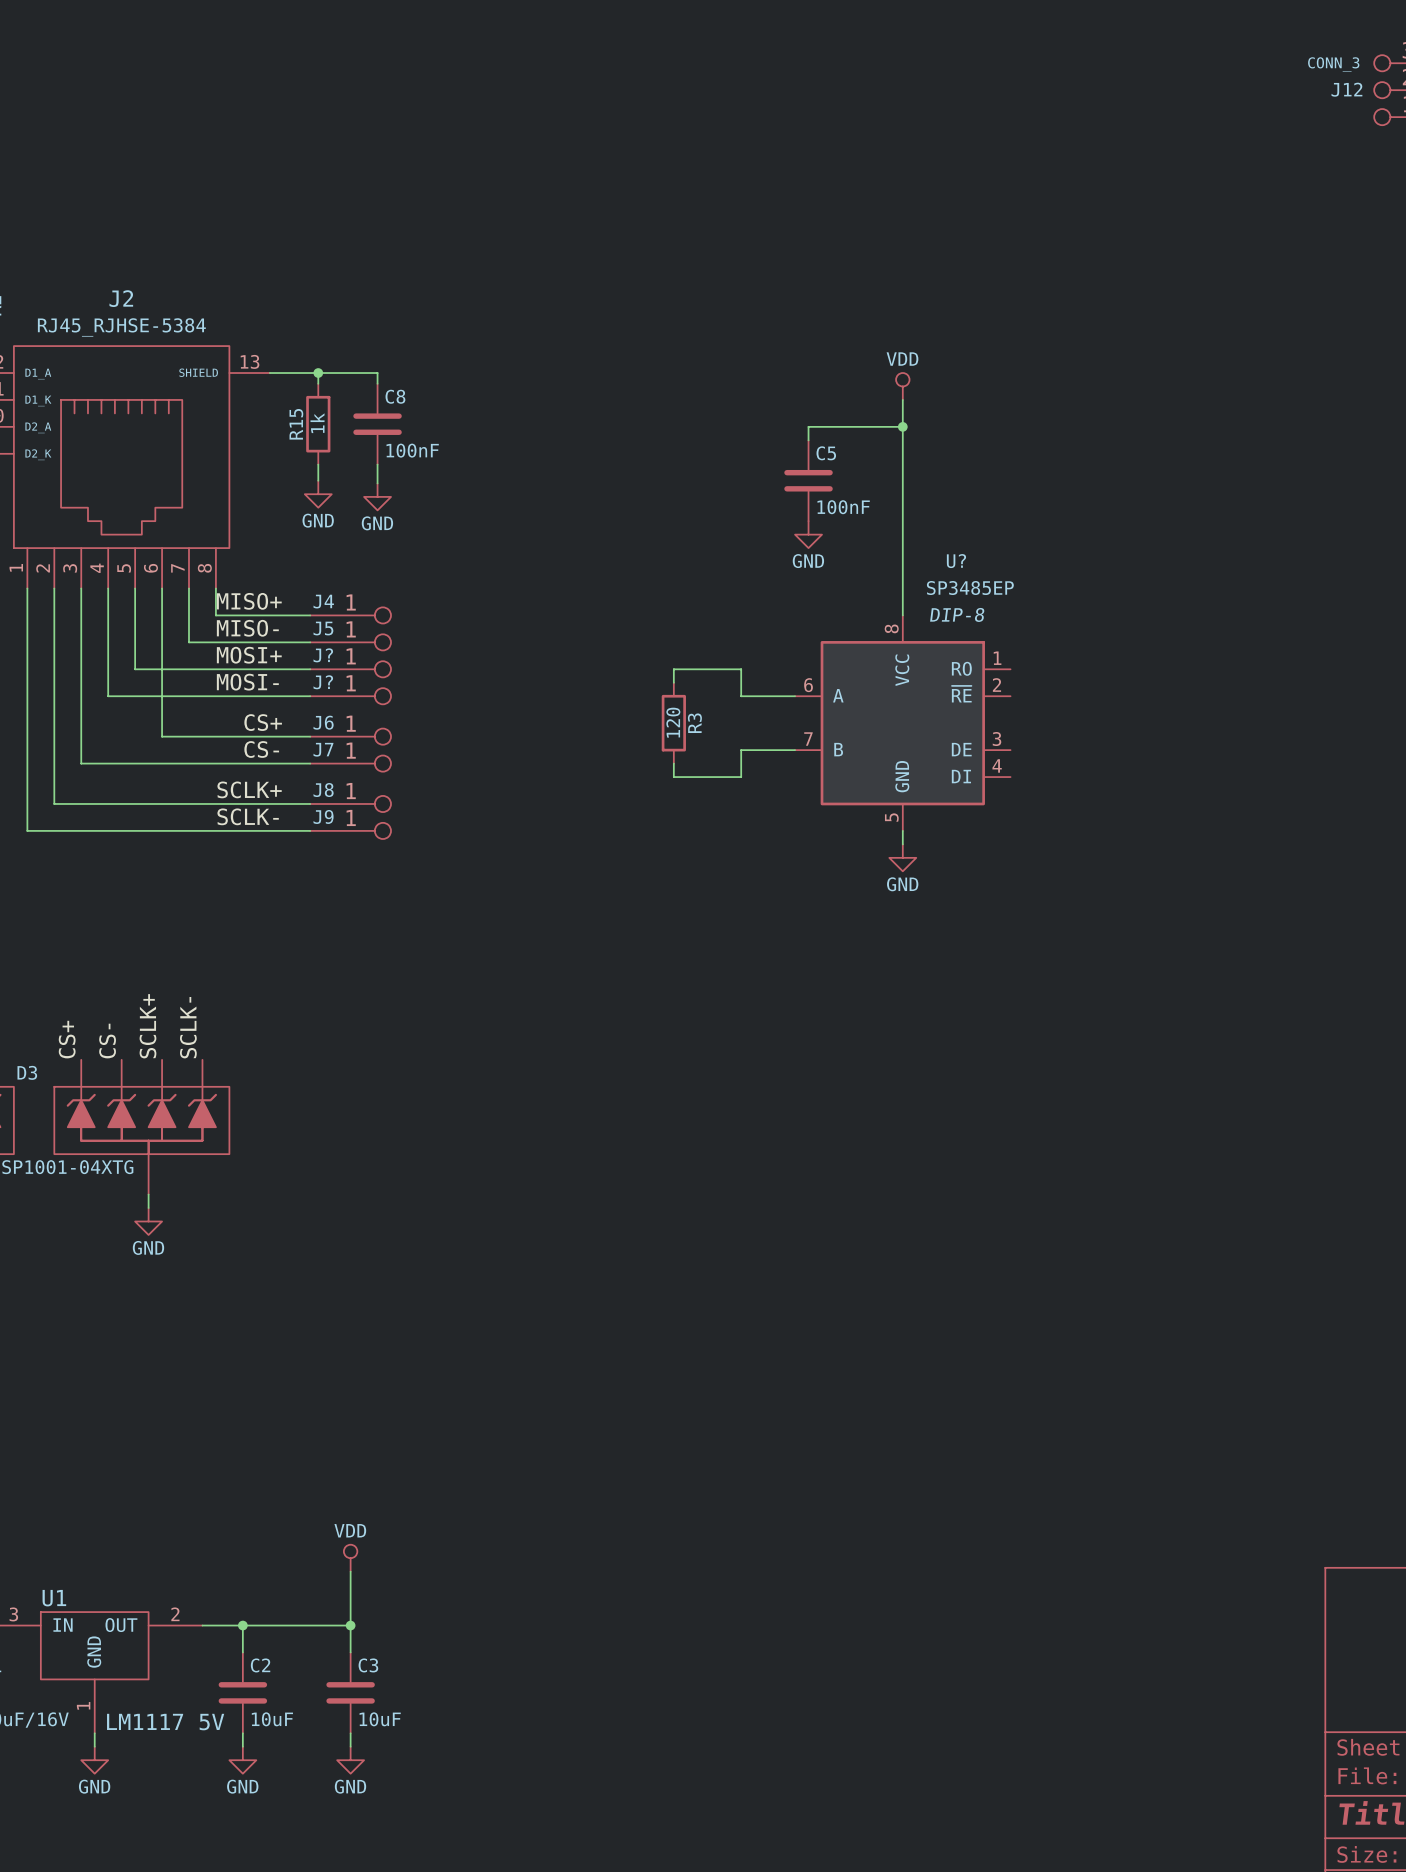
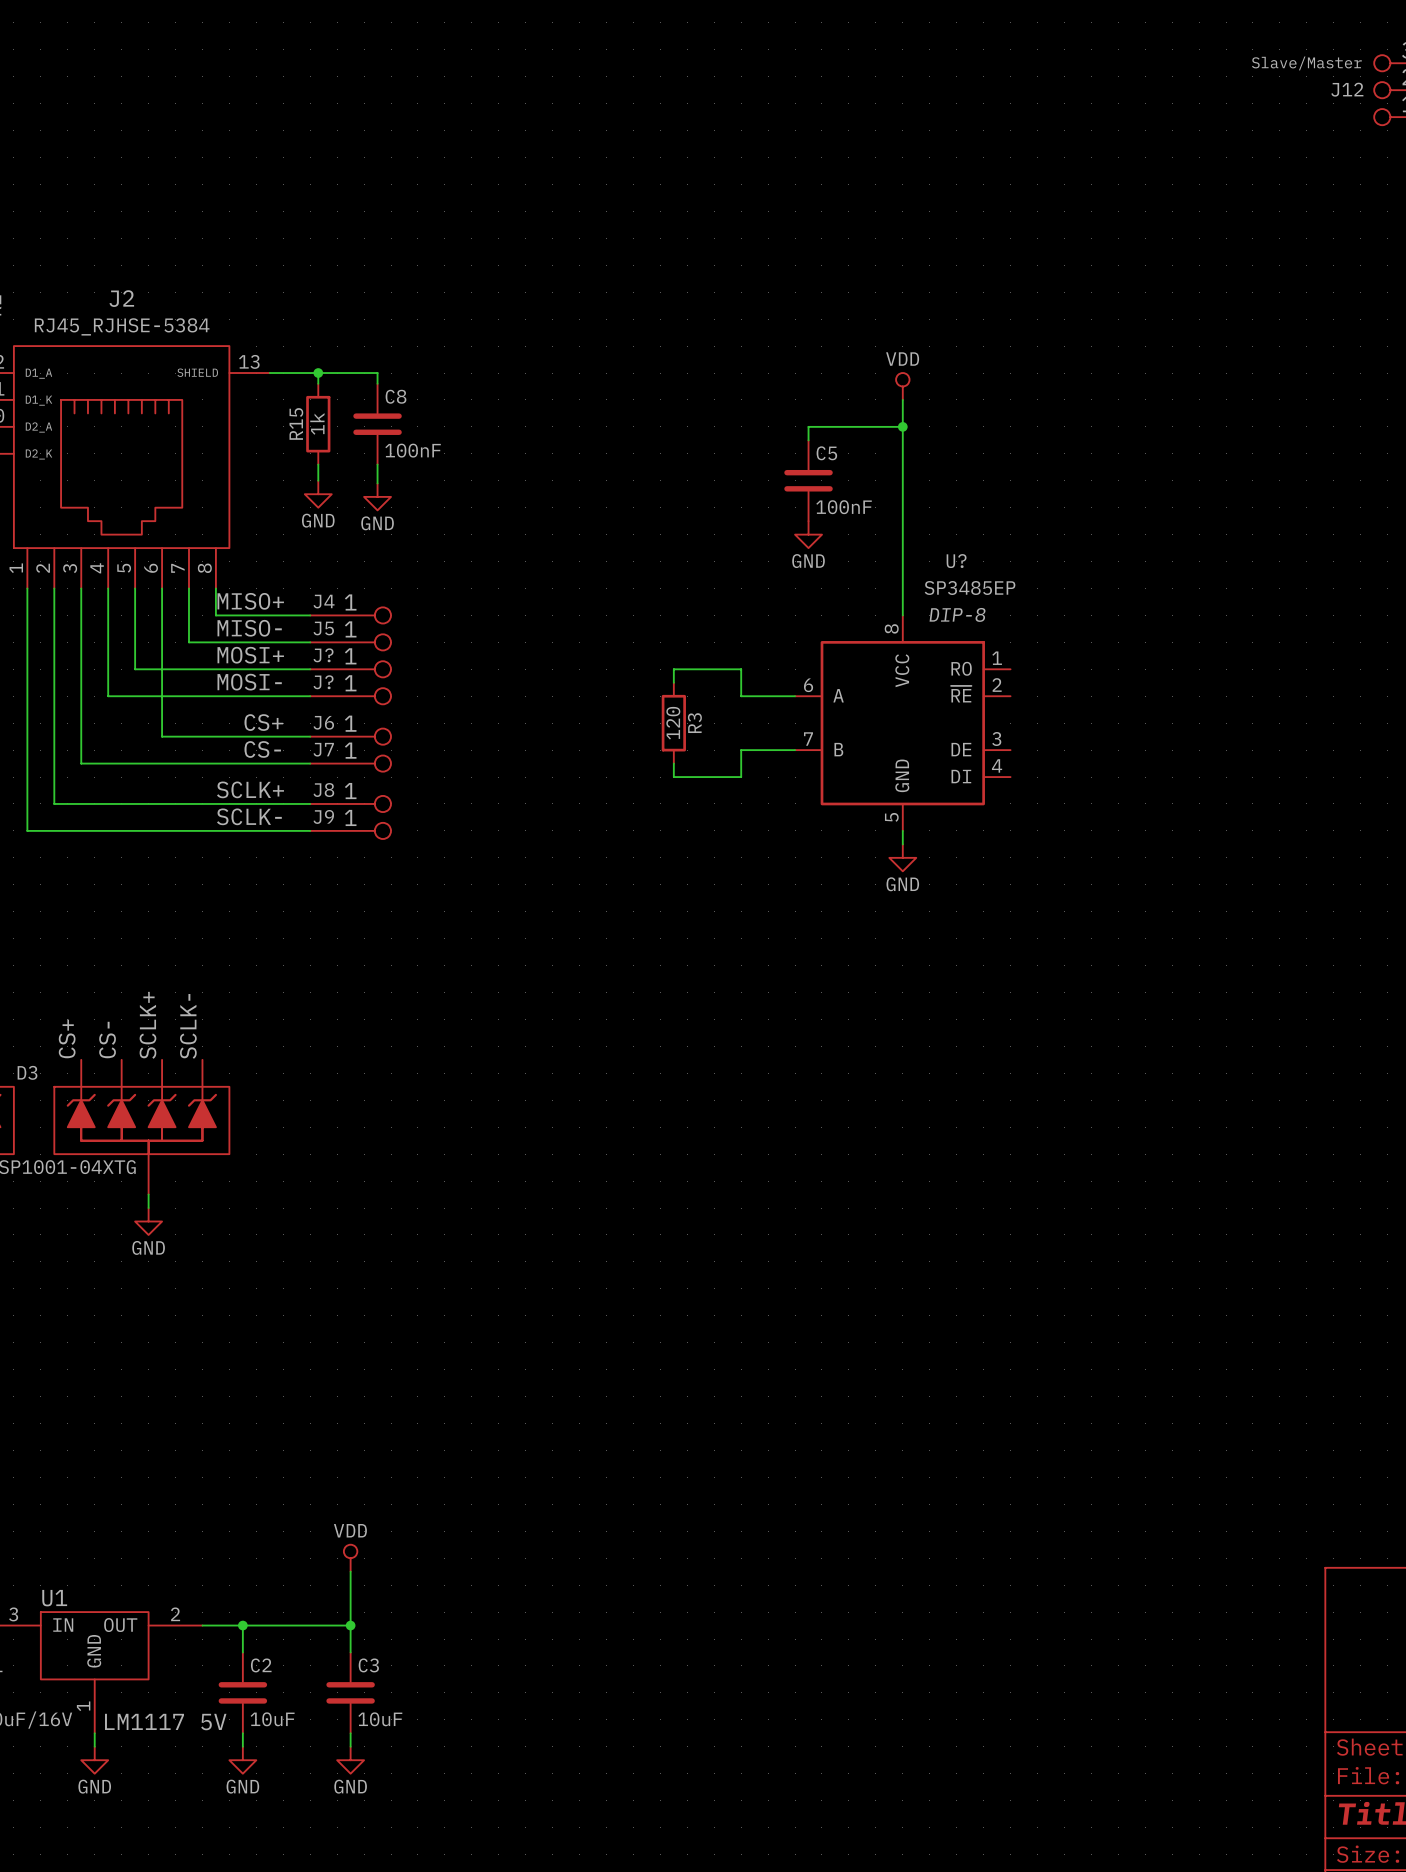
J12 value: CONN_3 (1333, 64) -> Slave/Master (1306, 63)

